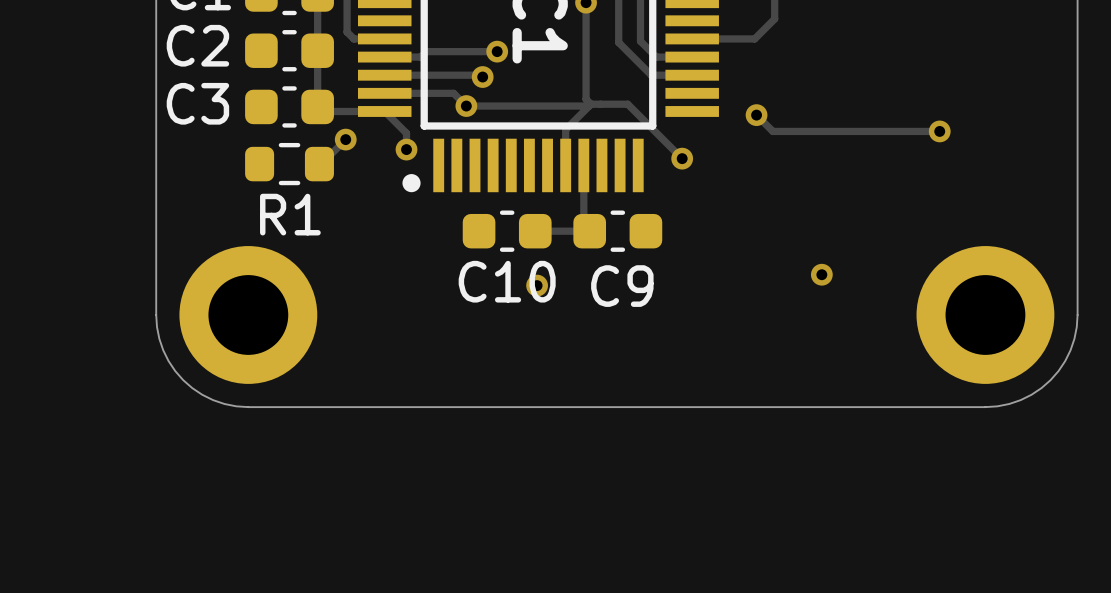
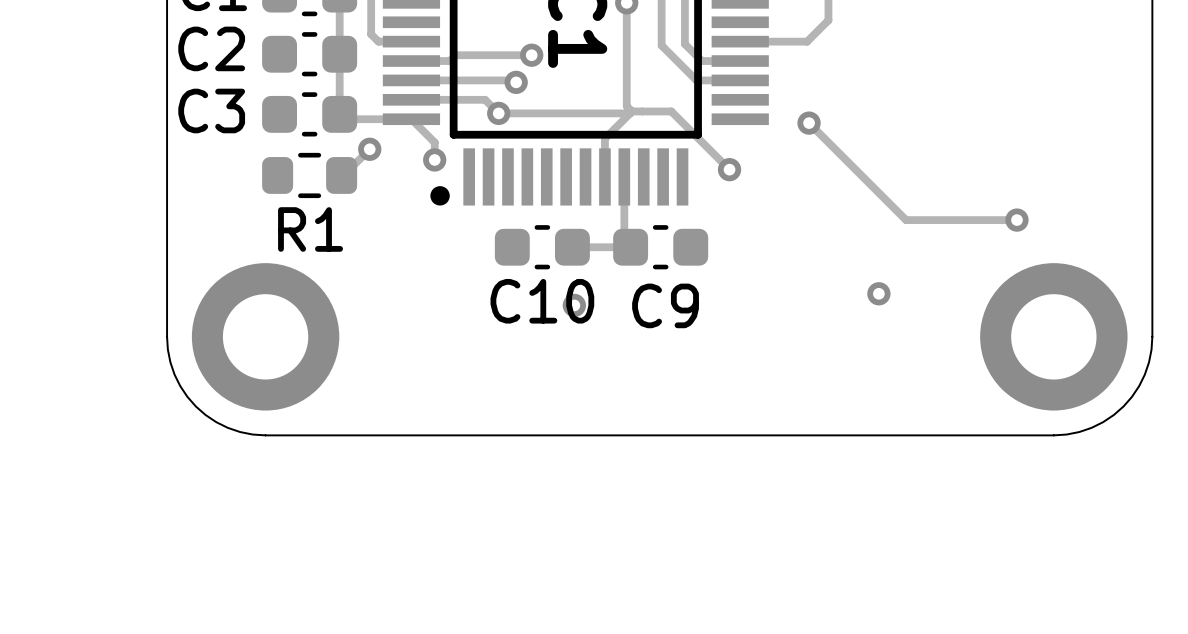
track: (939, 131) (772, 131) -> (1016, 220) (906, 220) (826, 140)
via position: (939, 131) -> (1016, 220)

